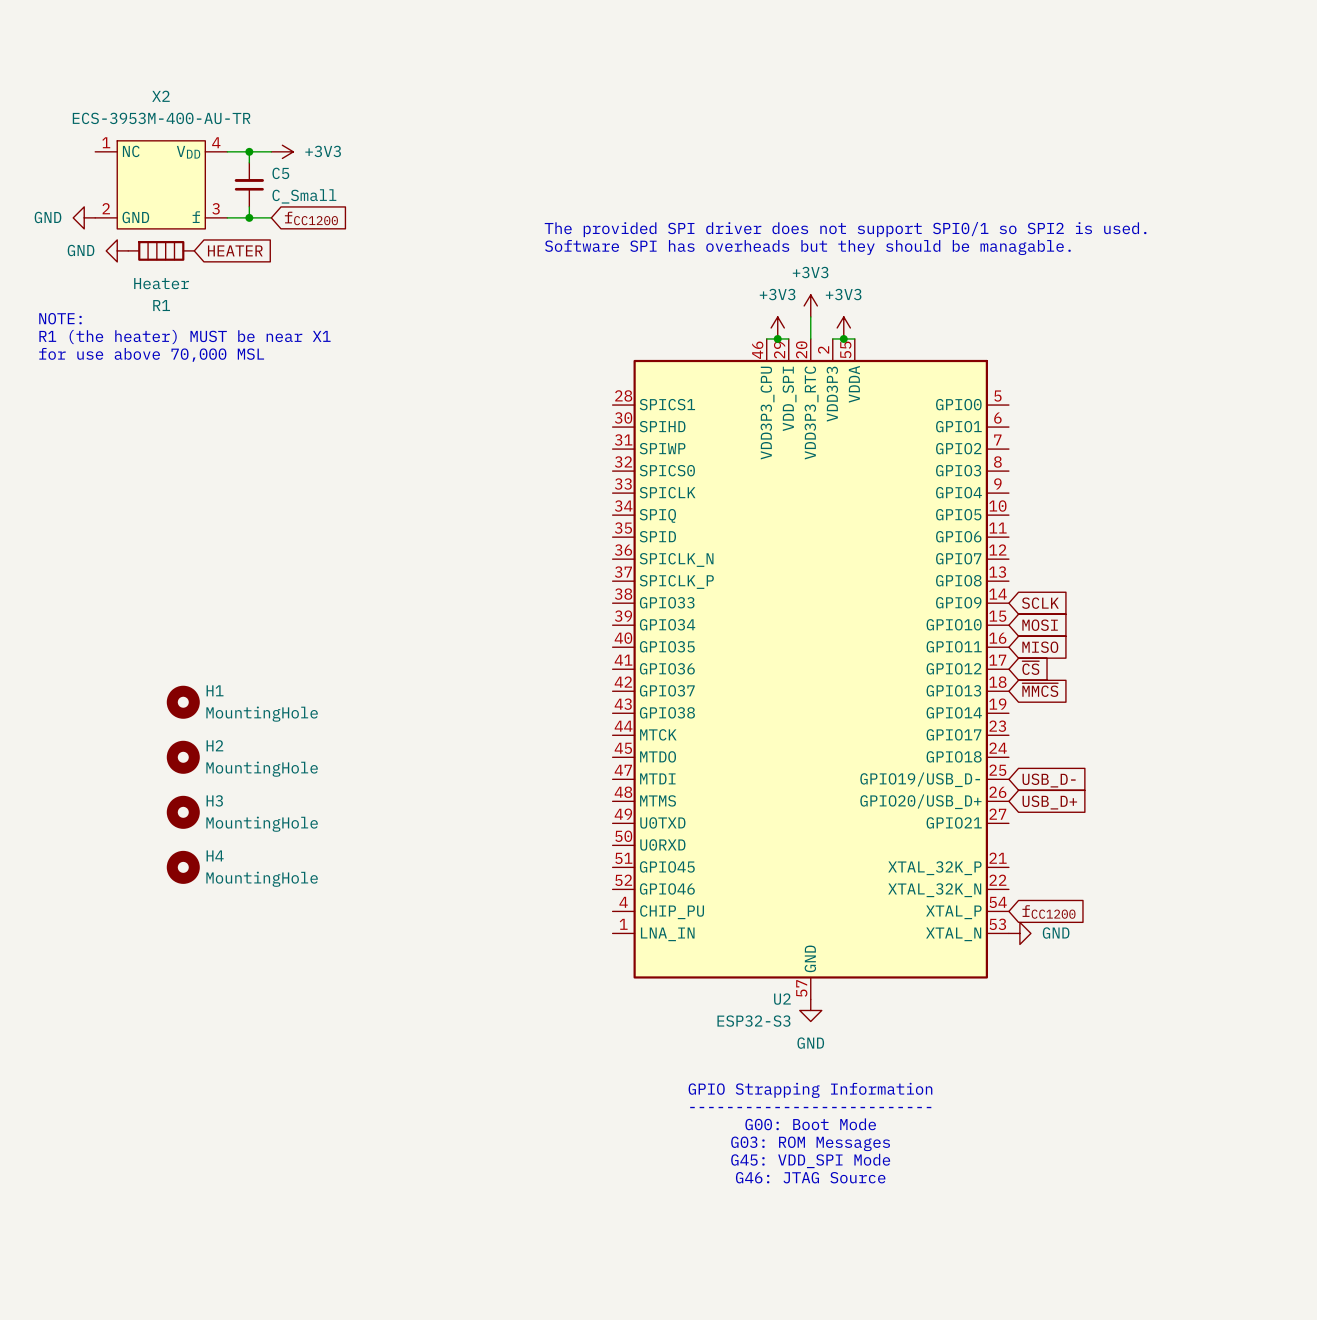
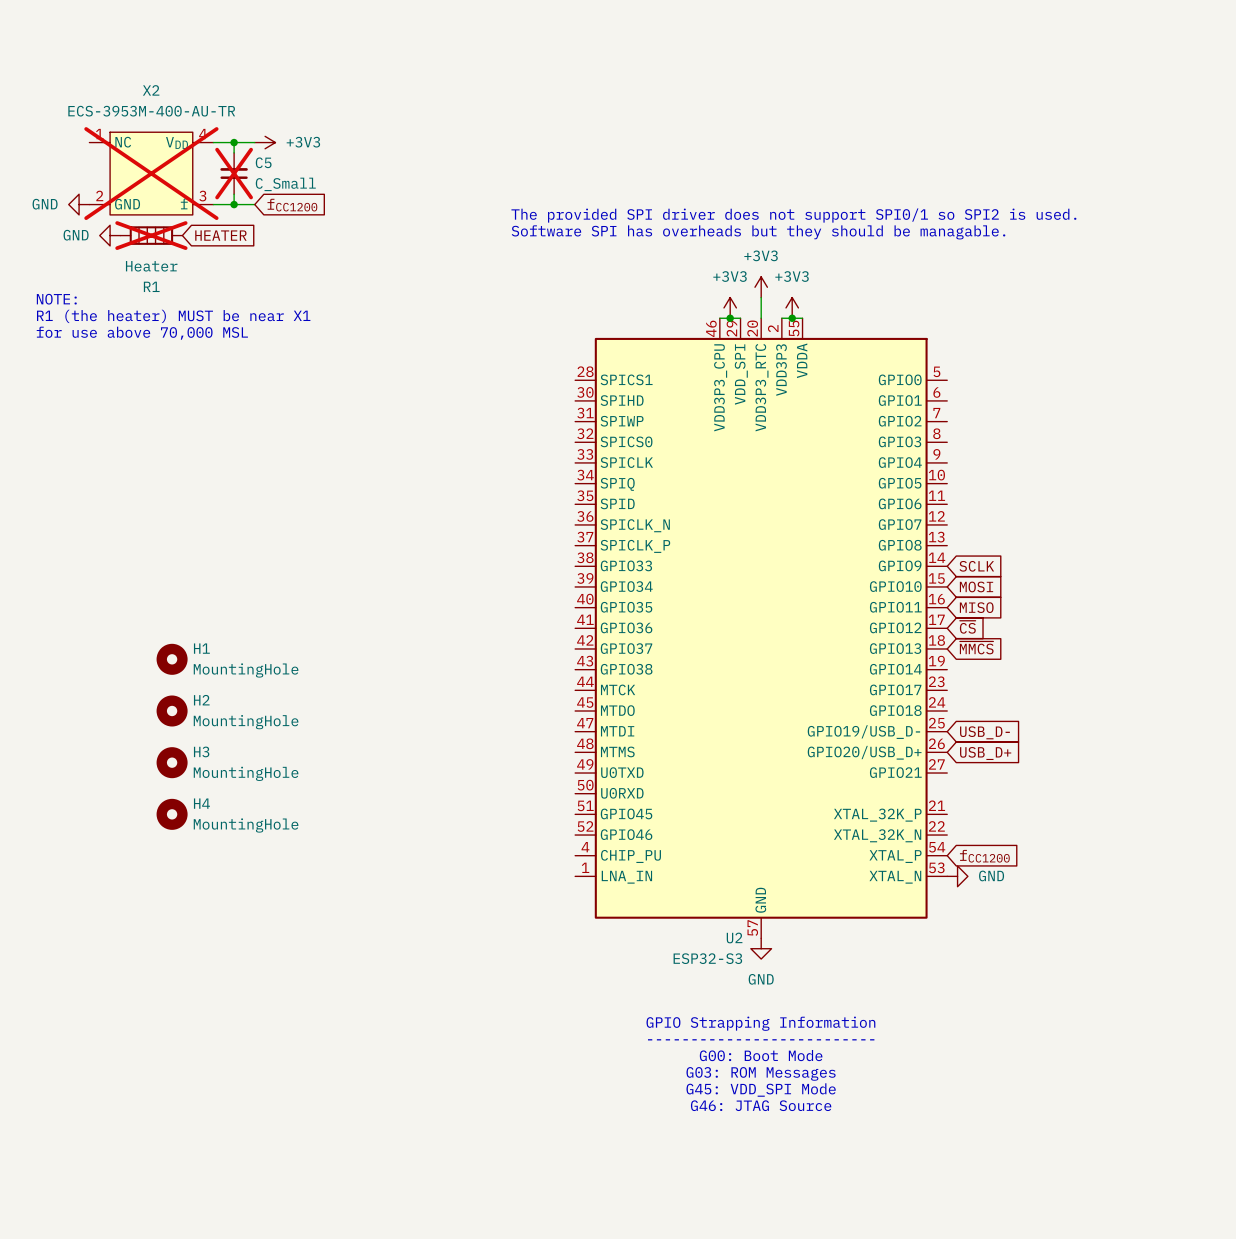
X2 do-not-place cross: none -> (151, 173)
C5 do-not-place cross: none -> (234, 173)
R1 do-not-place cross: none -> (151, 235)

